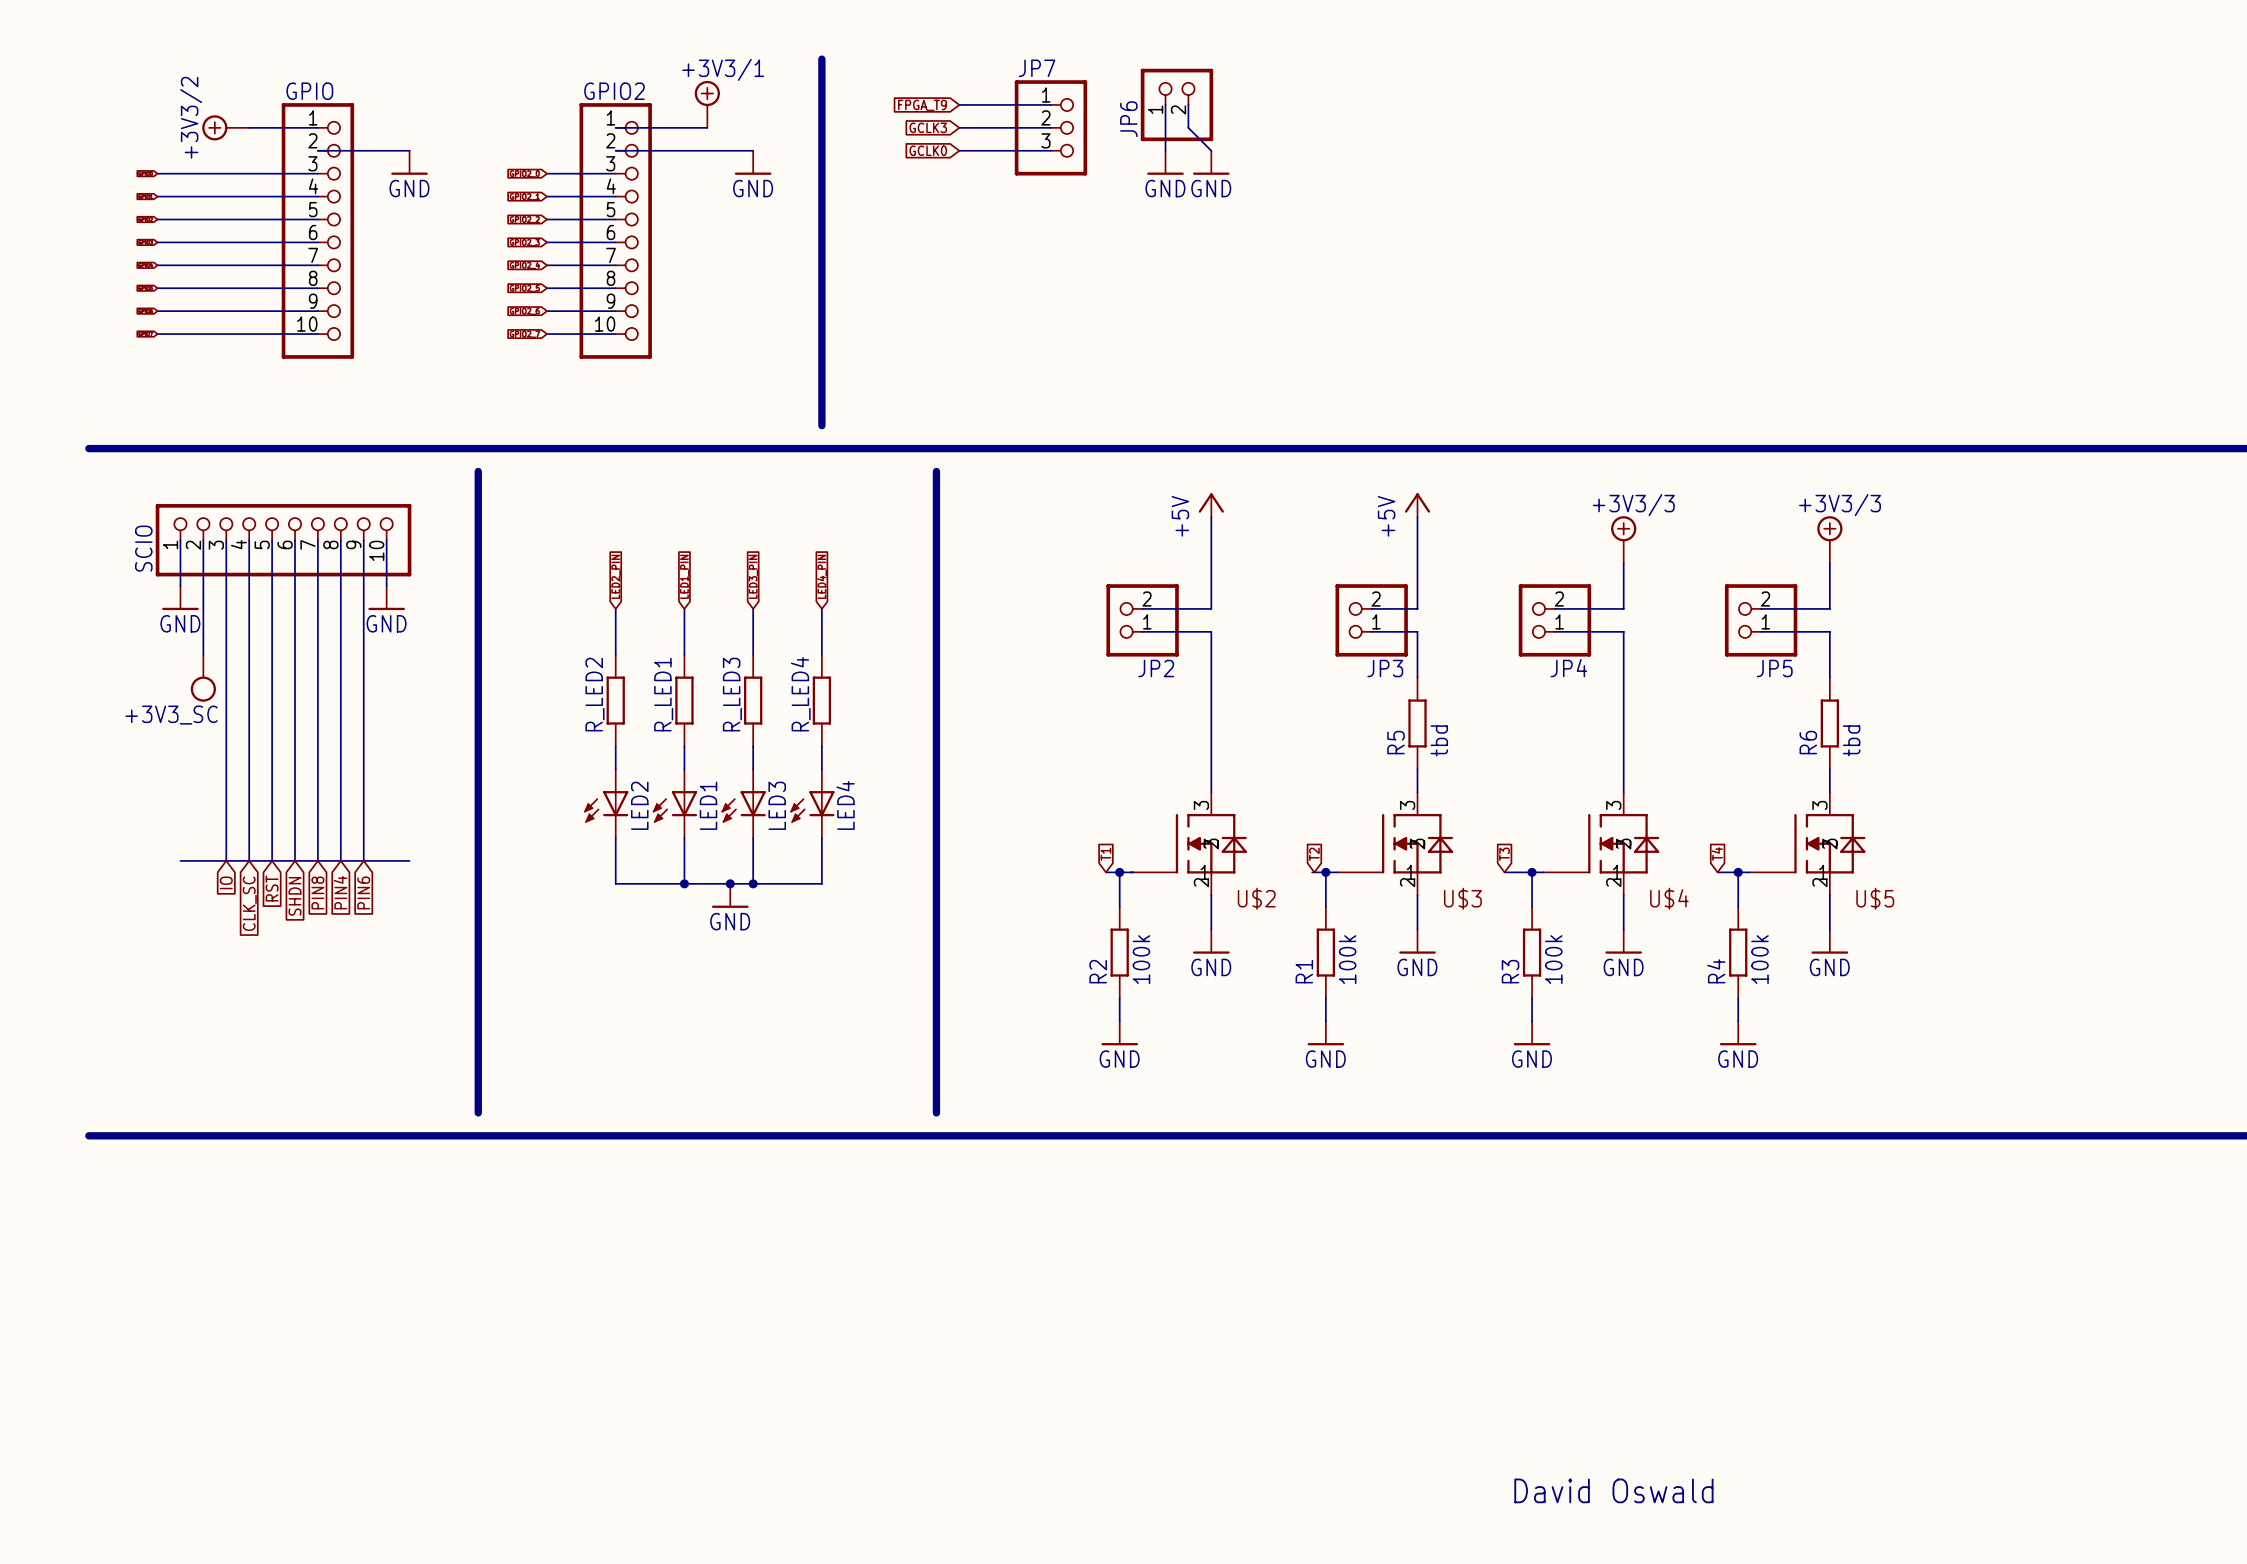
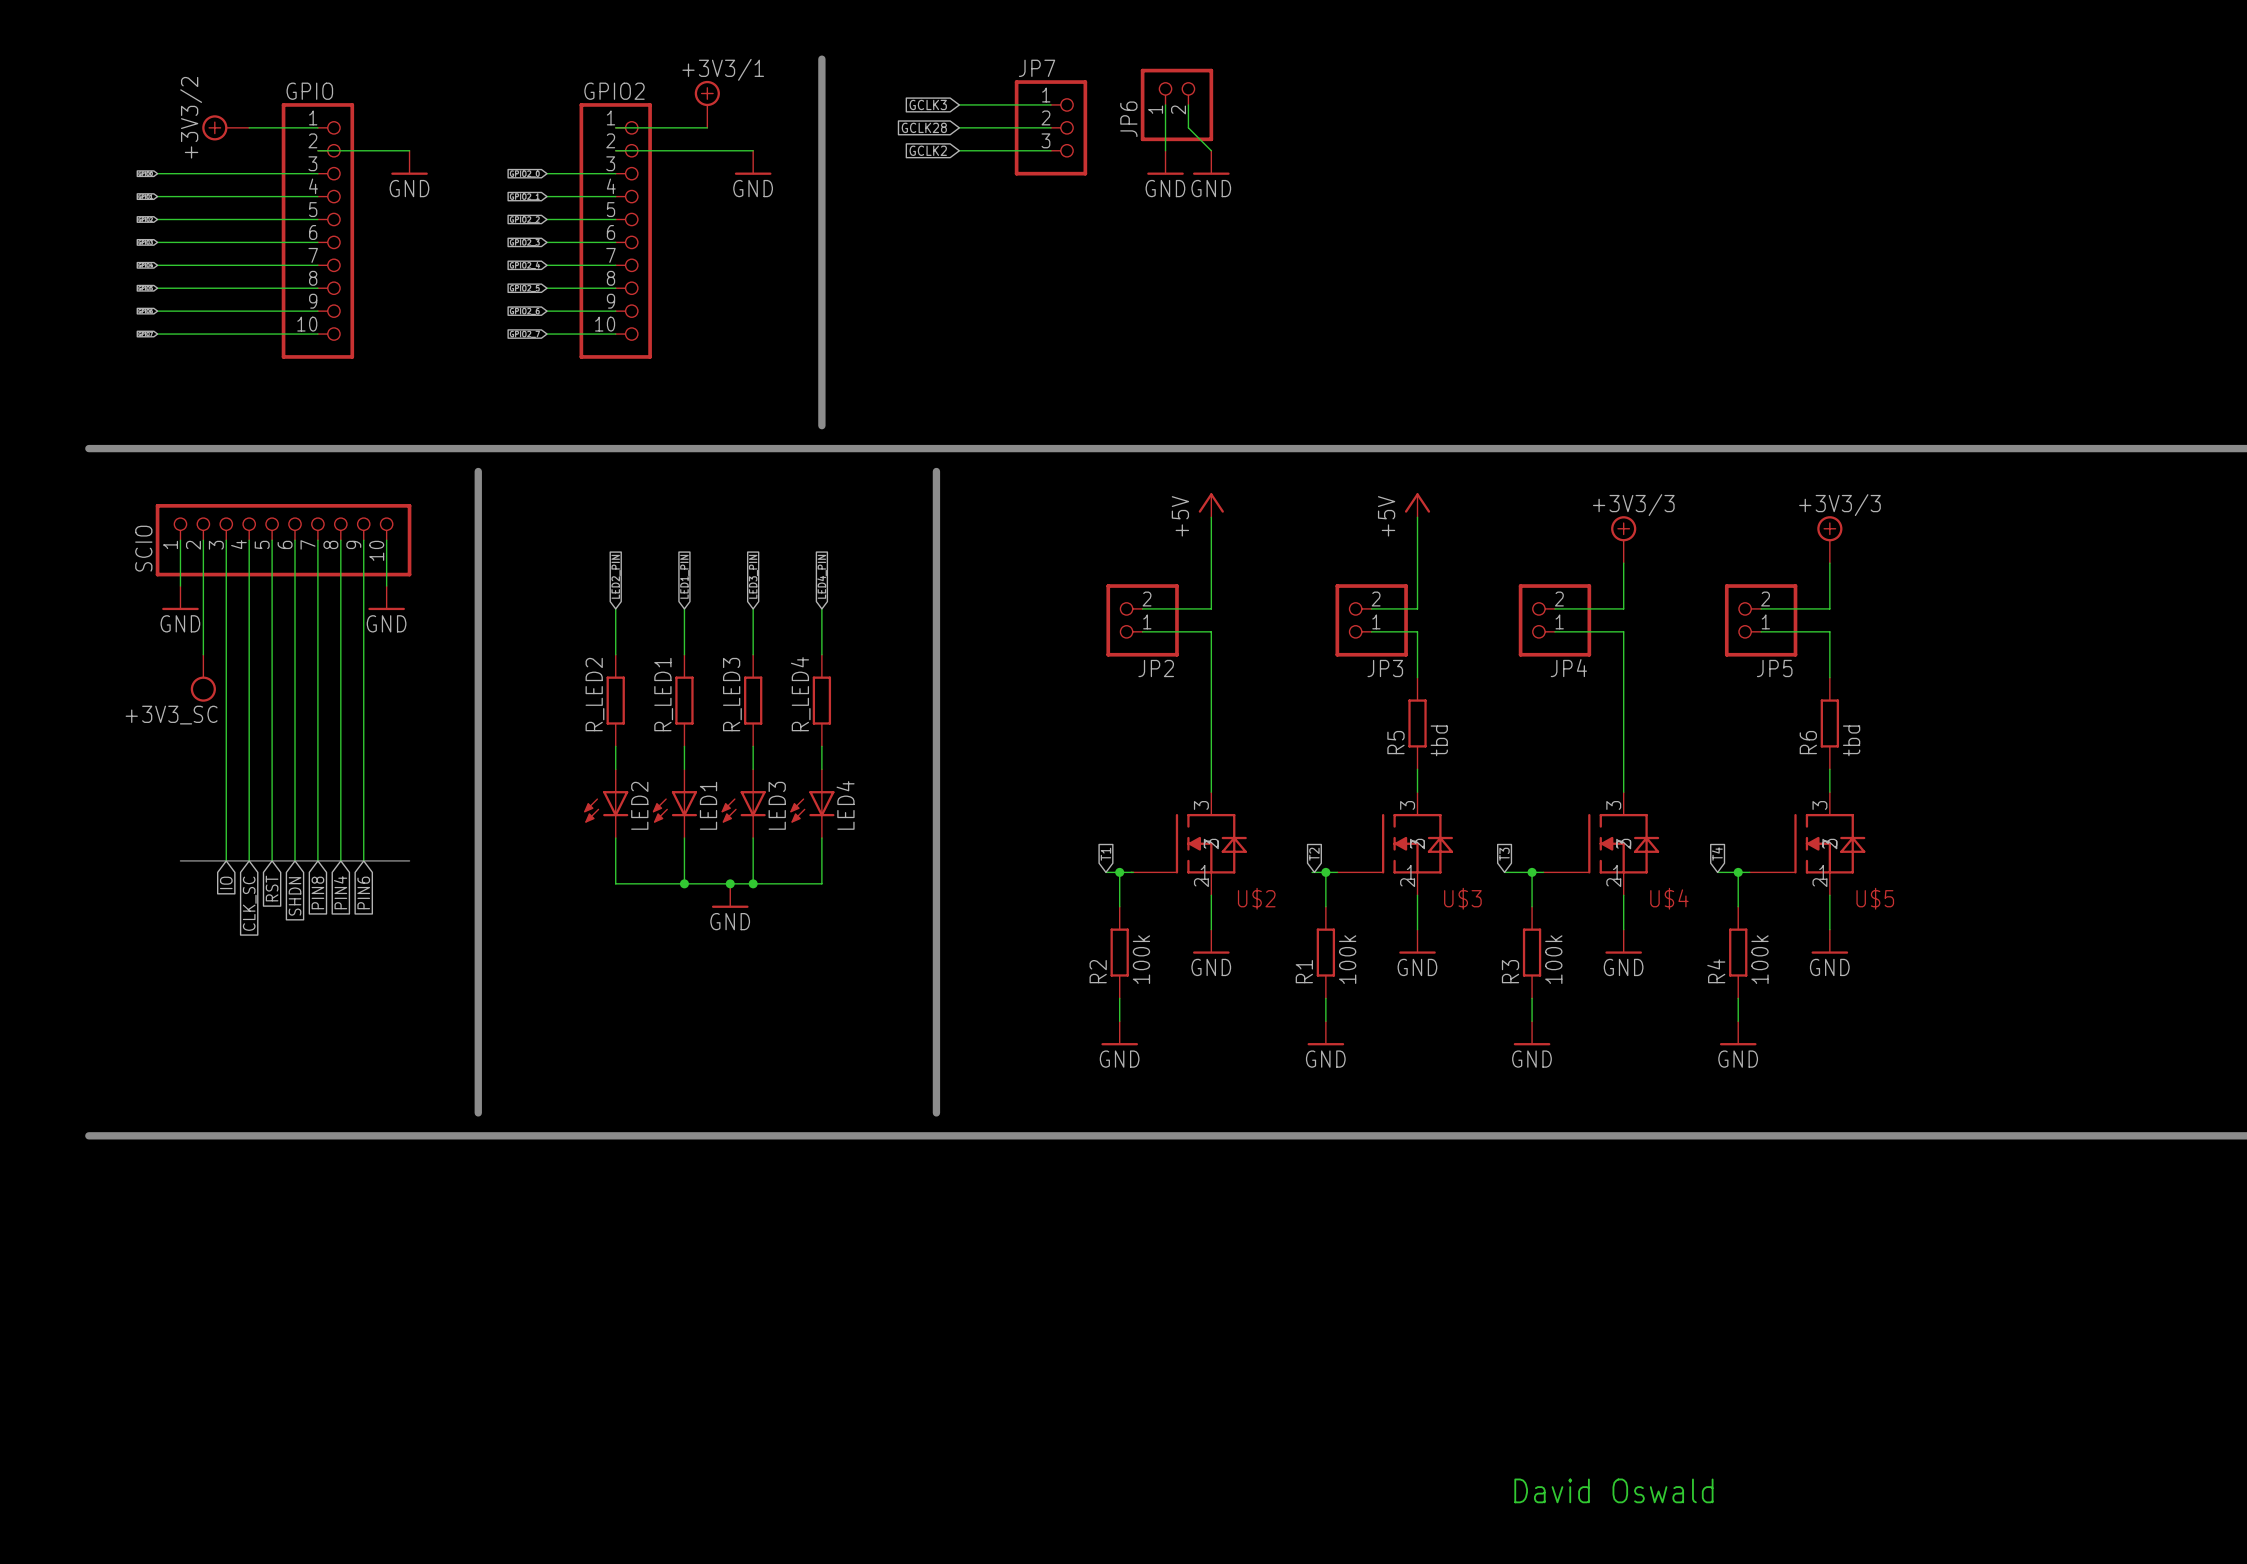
global label: FPGA_T9 (922, 105) -> GCLK3 (928, 104)
global label: GCLK3 (928, 127) -> GCLK28 (924, 127)
global label: GCLK0 (928, 150) -> GCLK2 (928, 150)

